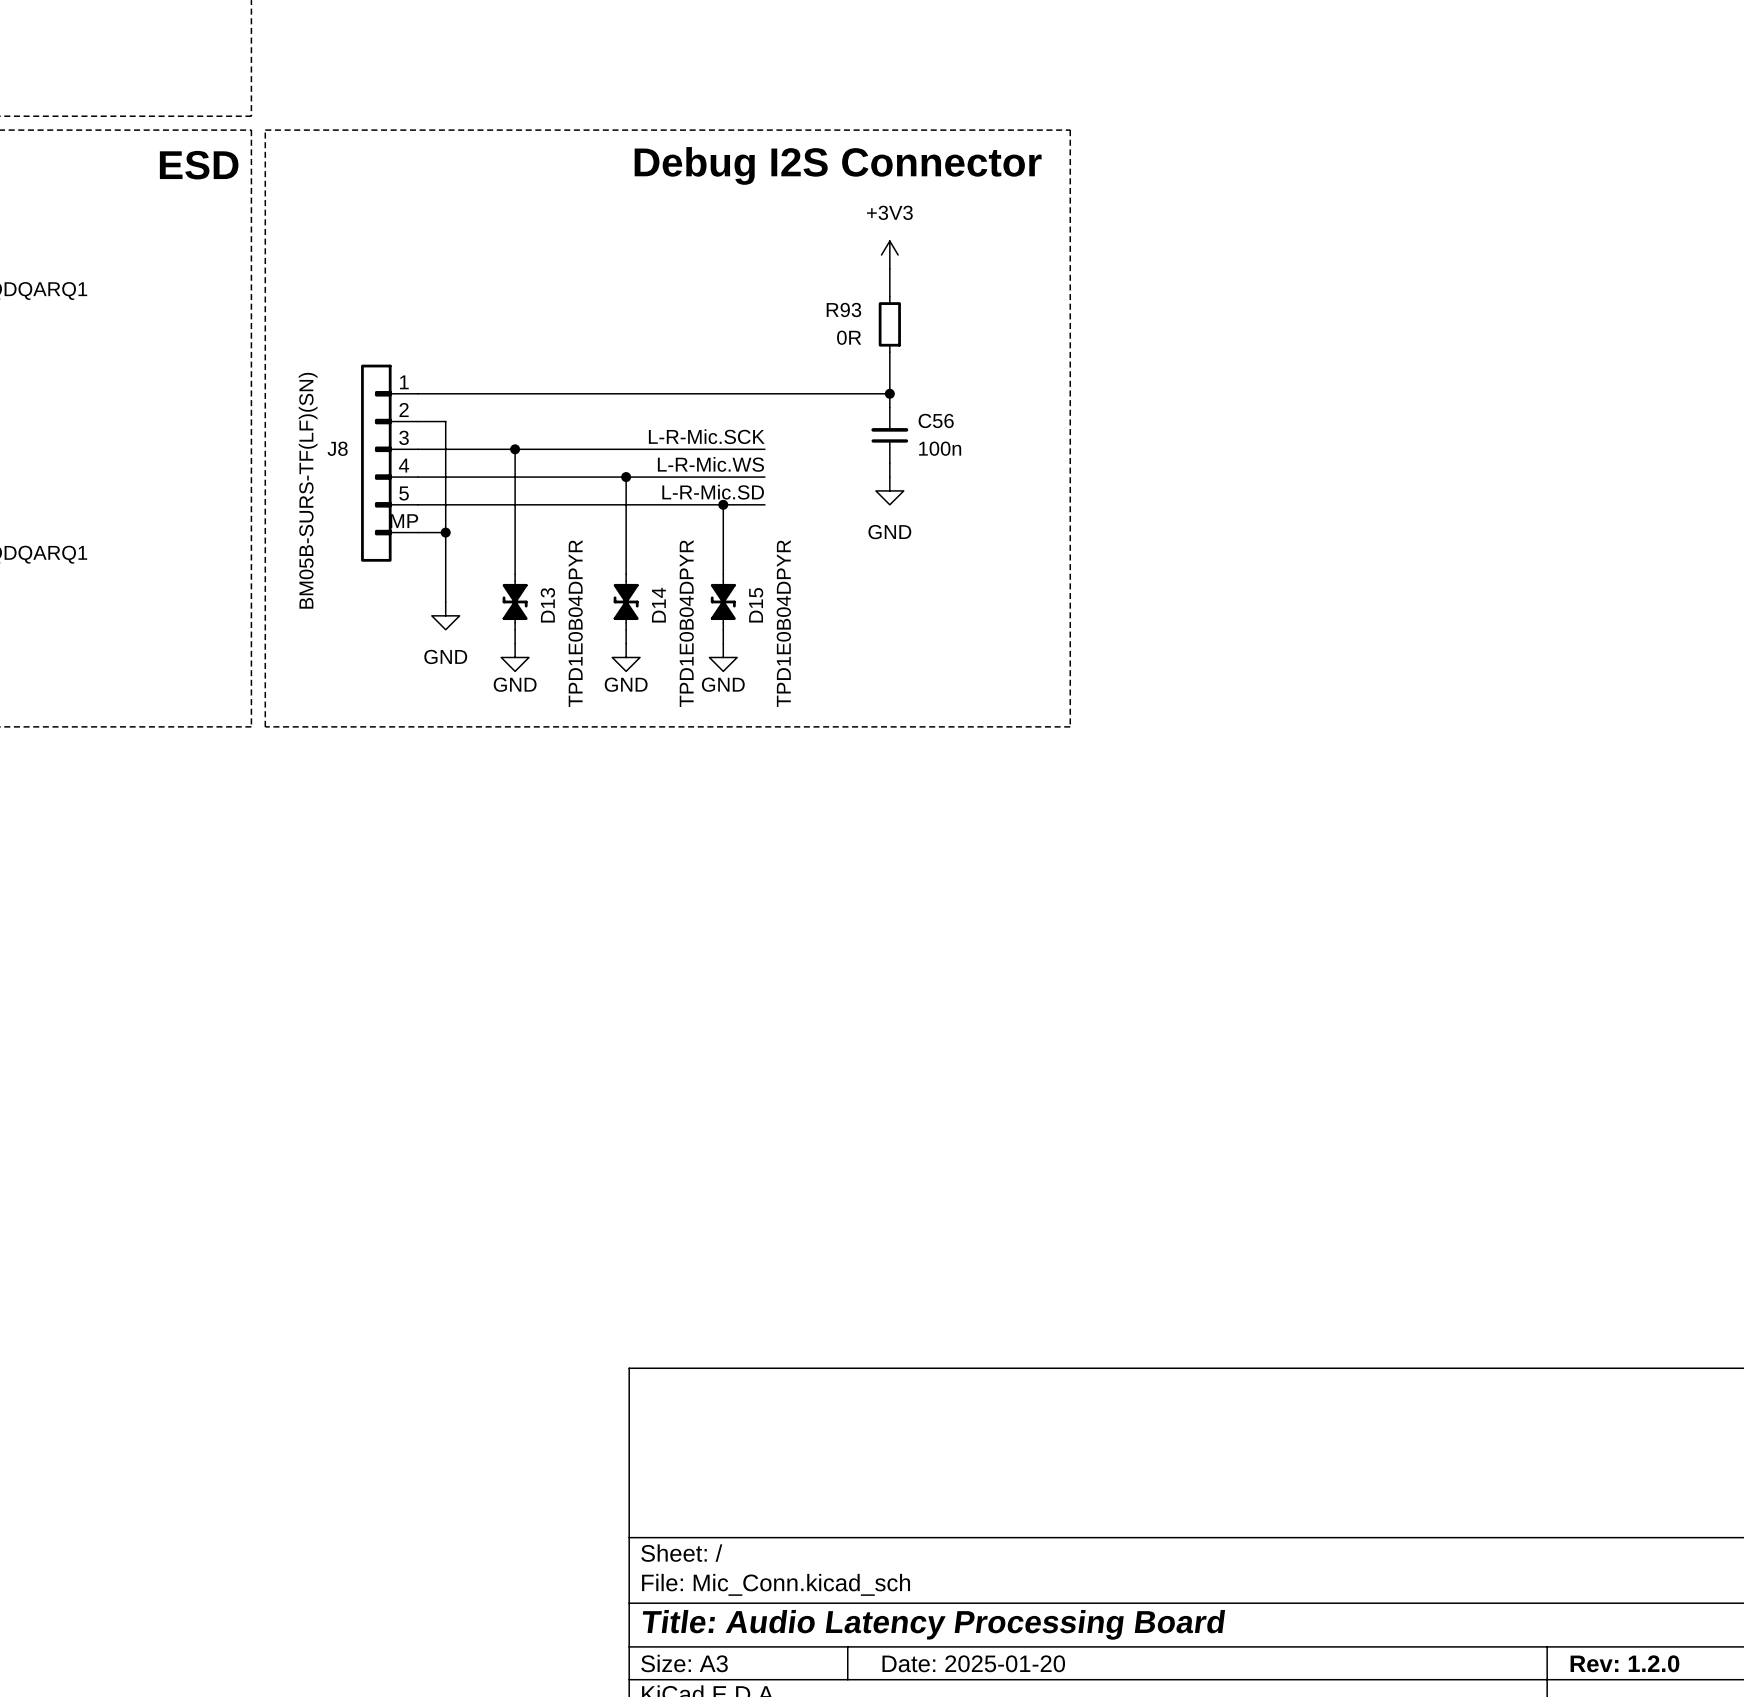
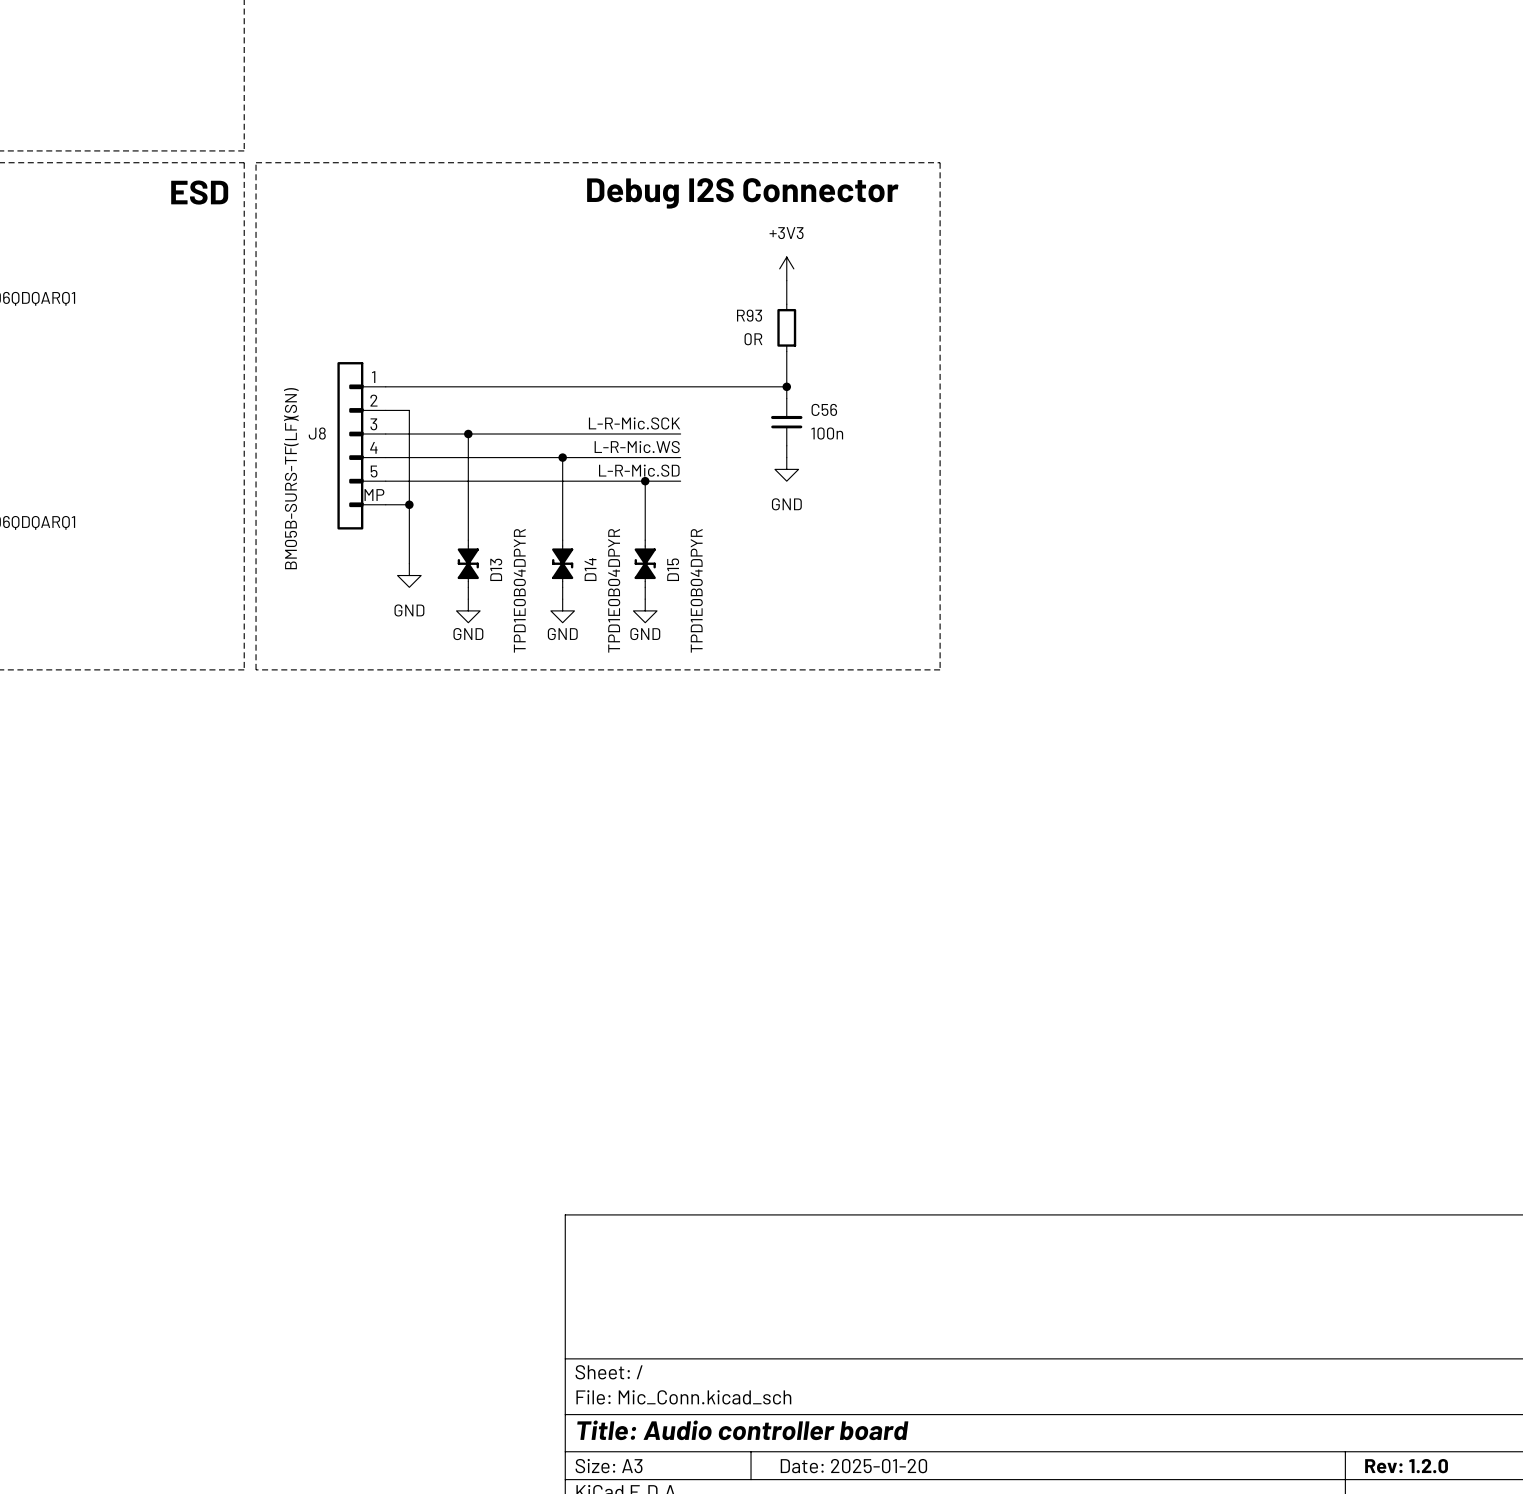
title block: Title: Audio Latency Processing Board (933, 1624) -> Title: Audio controller board (742, 1430)

